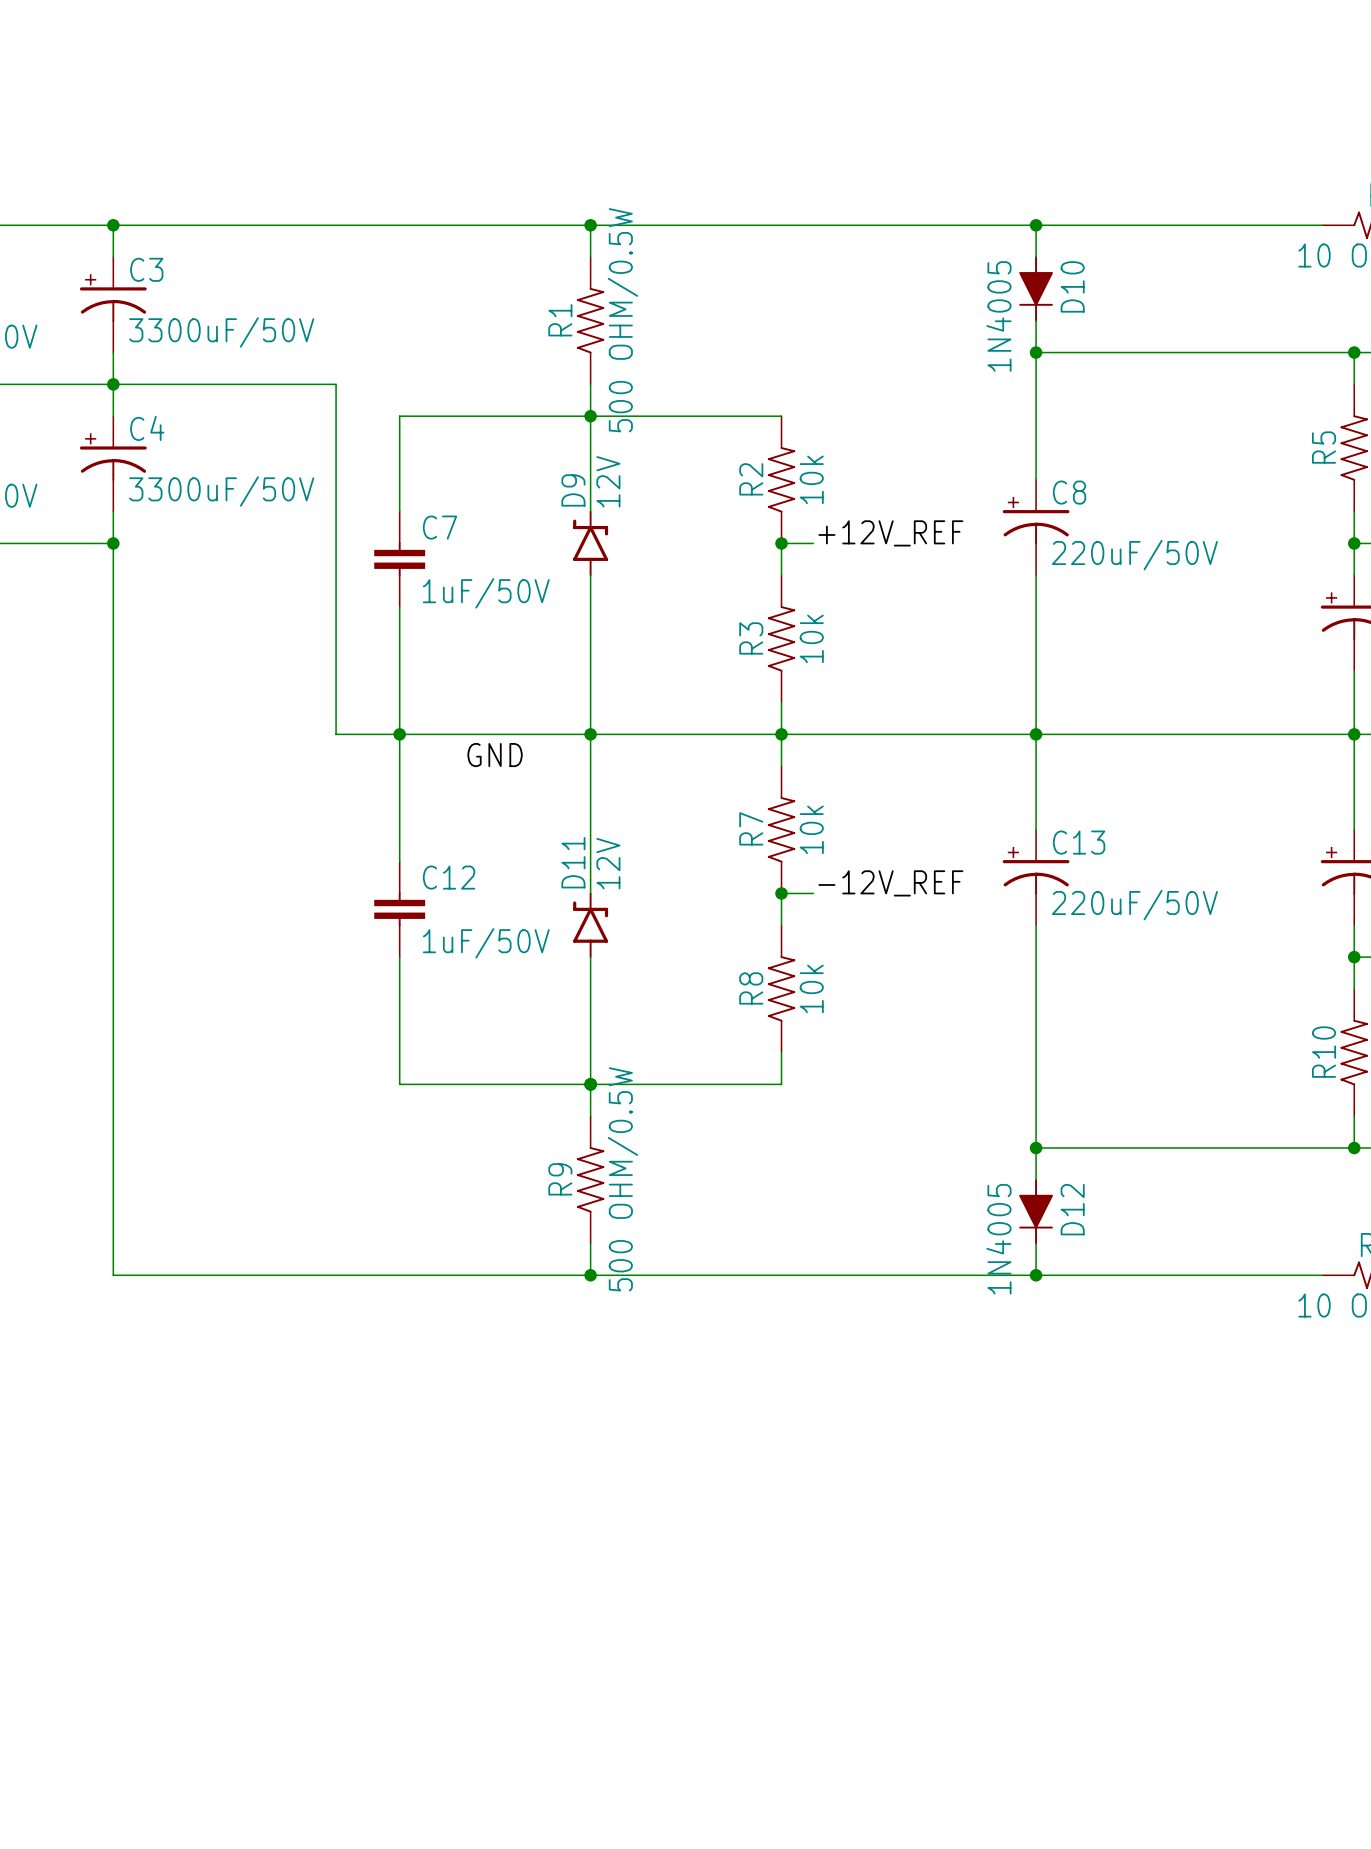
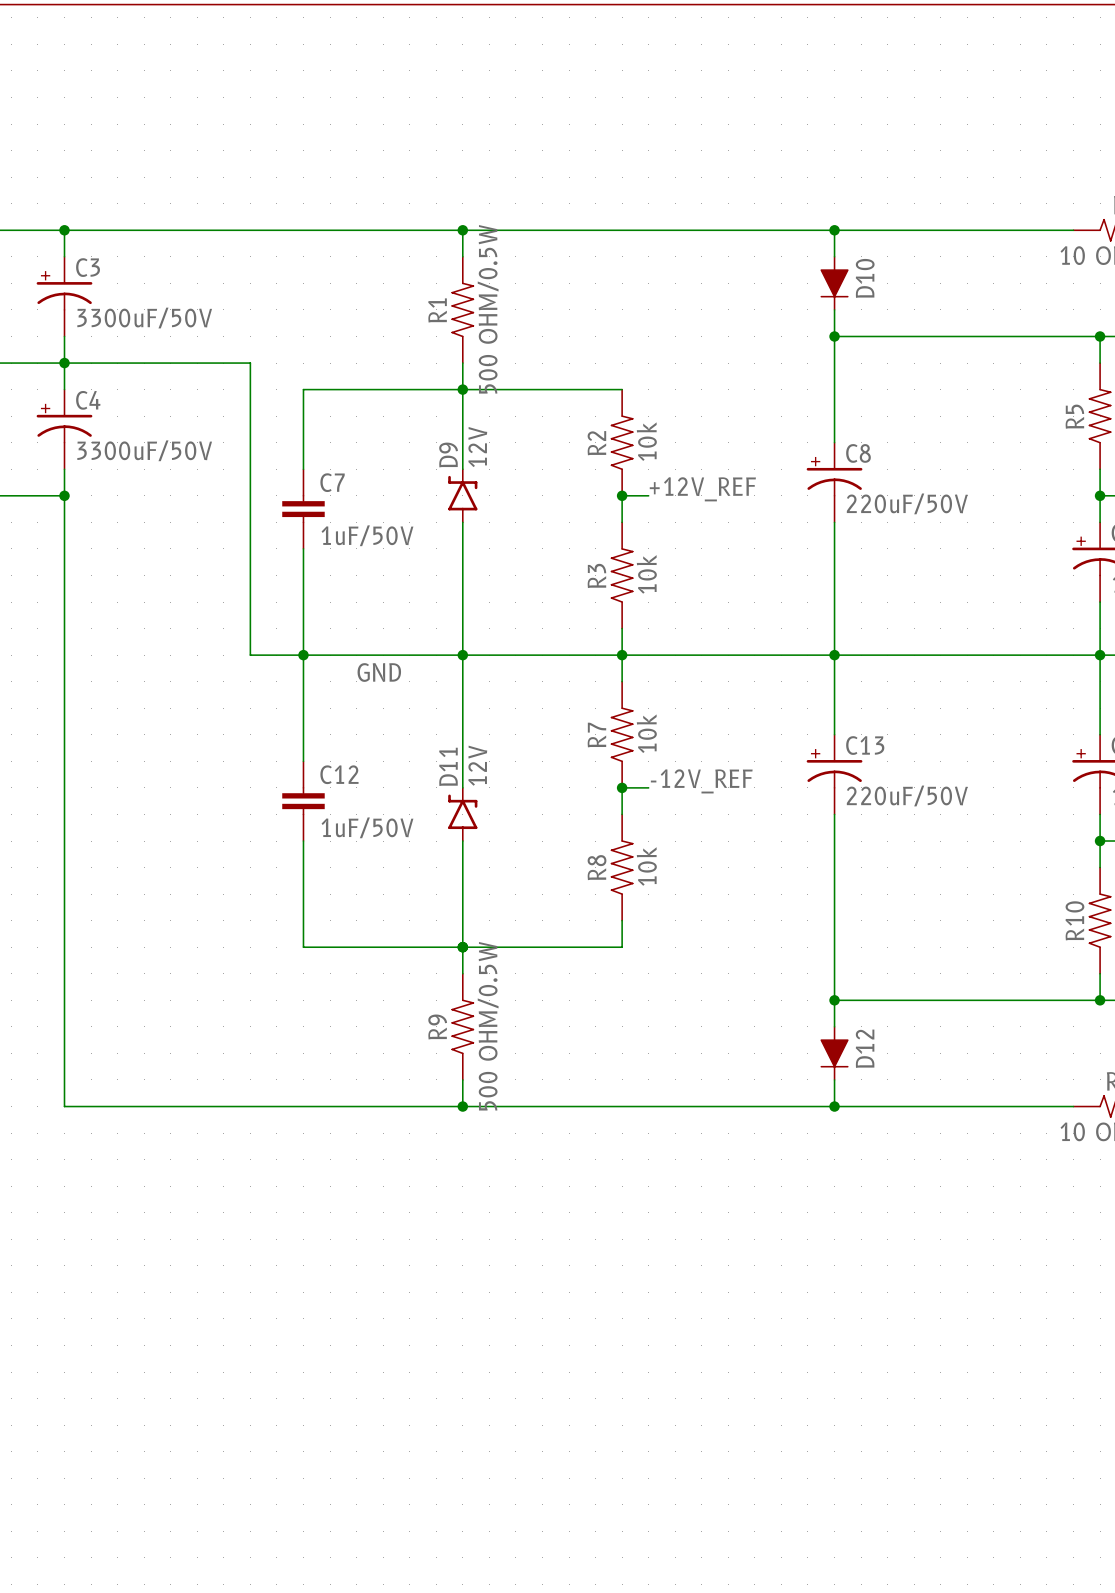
D10 value: 1N4005 (998, 316) -> none
D12 value: 1N4005 (998, 1239) -> none

